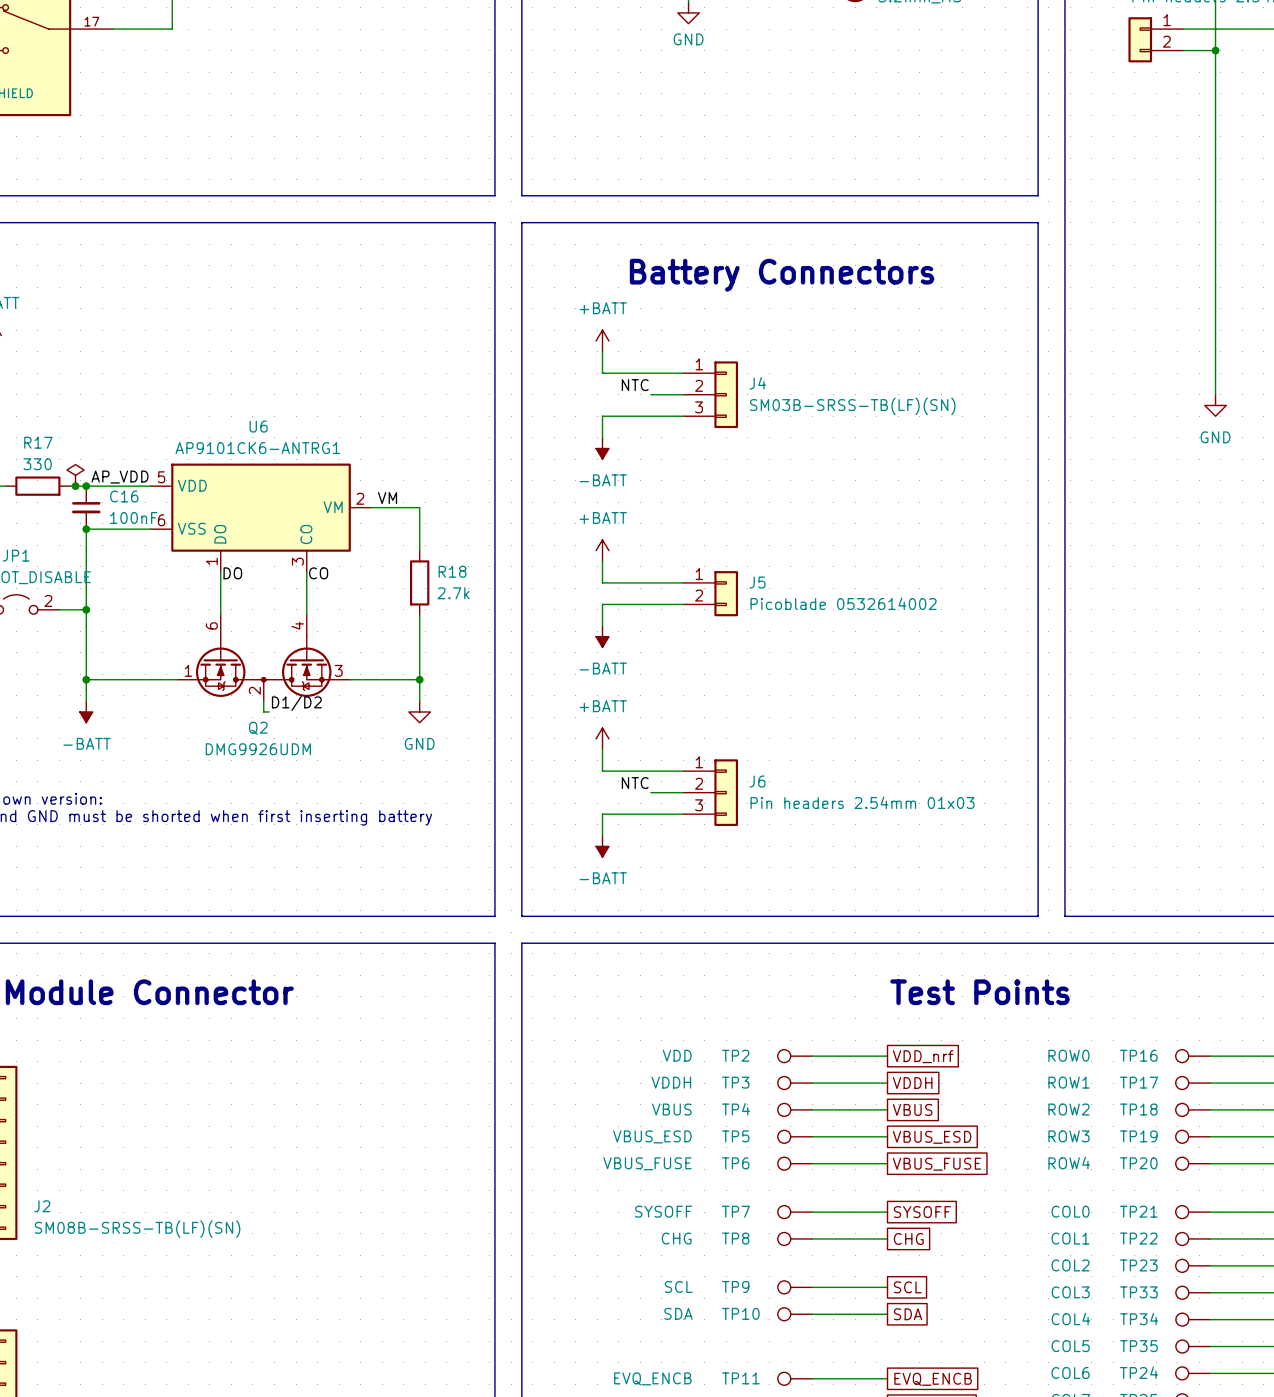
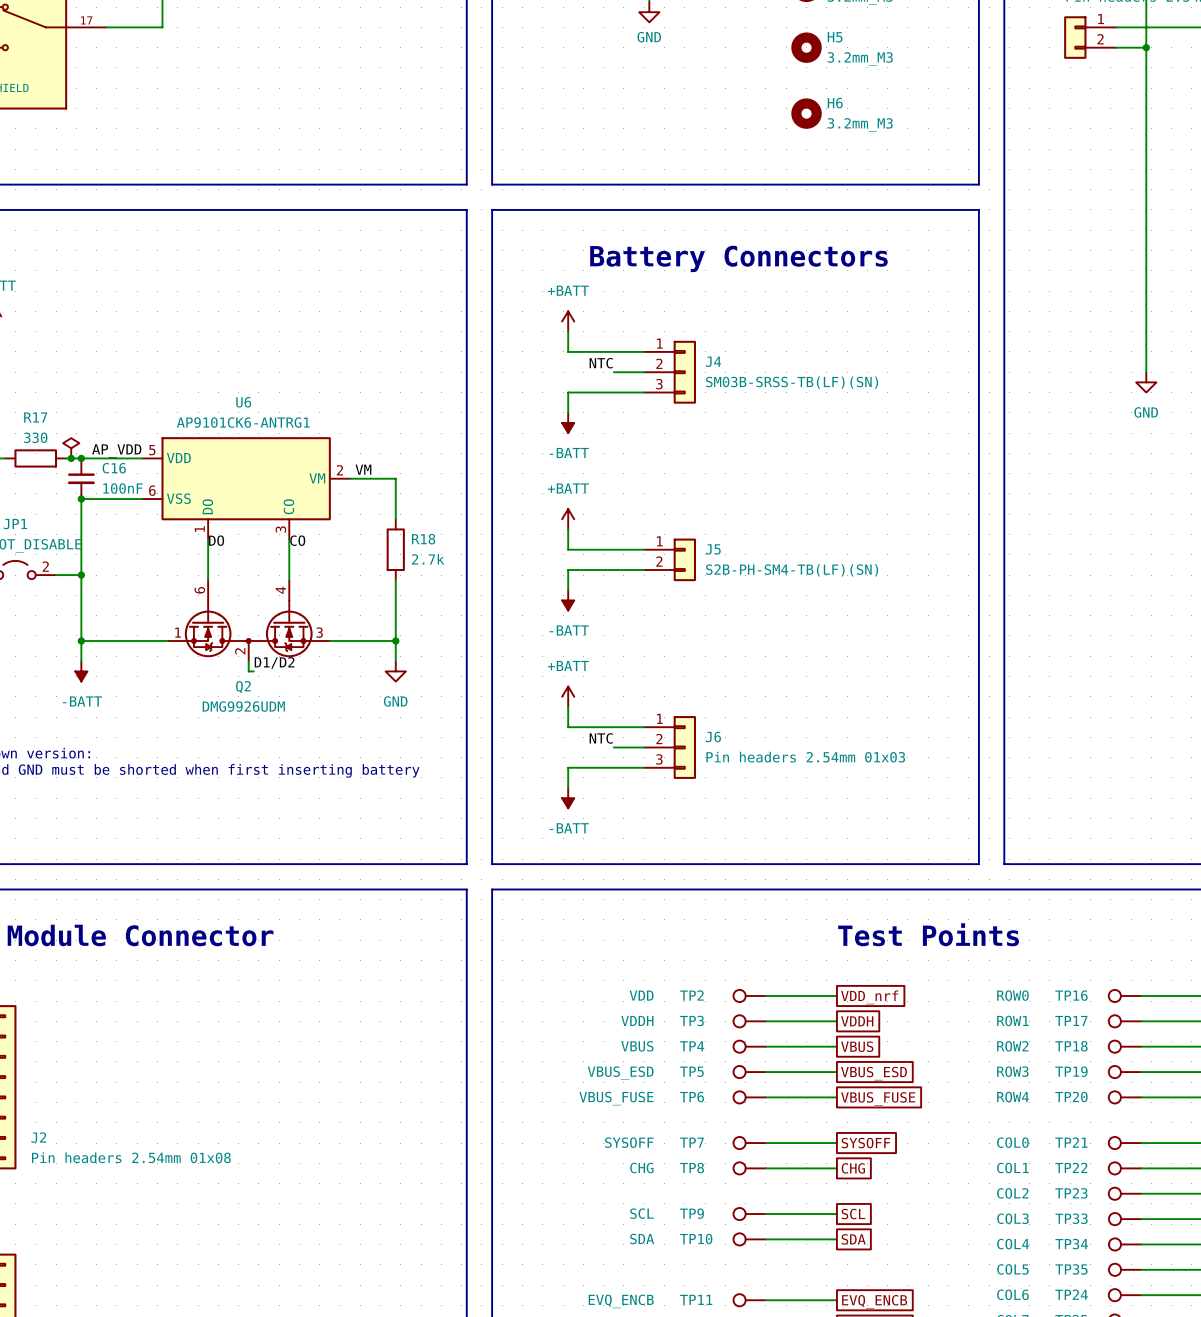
H5: none -> 3.2mm_M3 (806, 47)
H6: none -> 3.2mm_M3 (806, 113)
J5 value: Picoblade 0532614002 (843, 603) -> S2B-PH-SM4-TB(LF)(SN) (792, 570)
J2 value: SM08B-SRSS-TB(LF)(SN) (137, 1229) -> Pin headers 2.54mm 01x08 (131, 1157)

